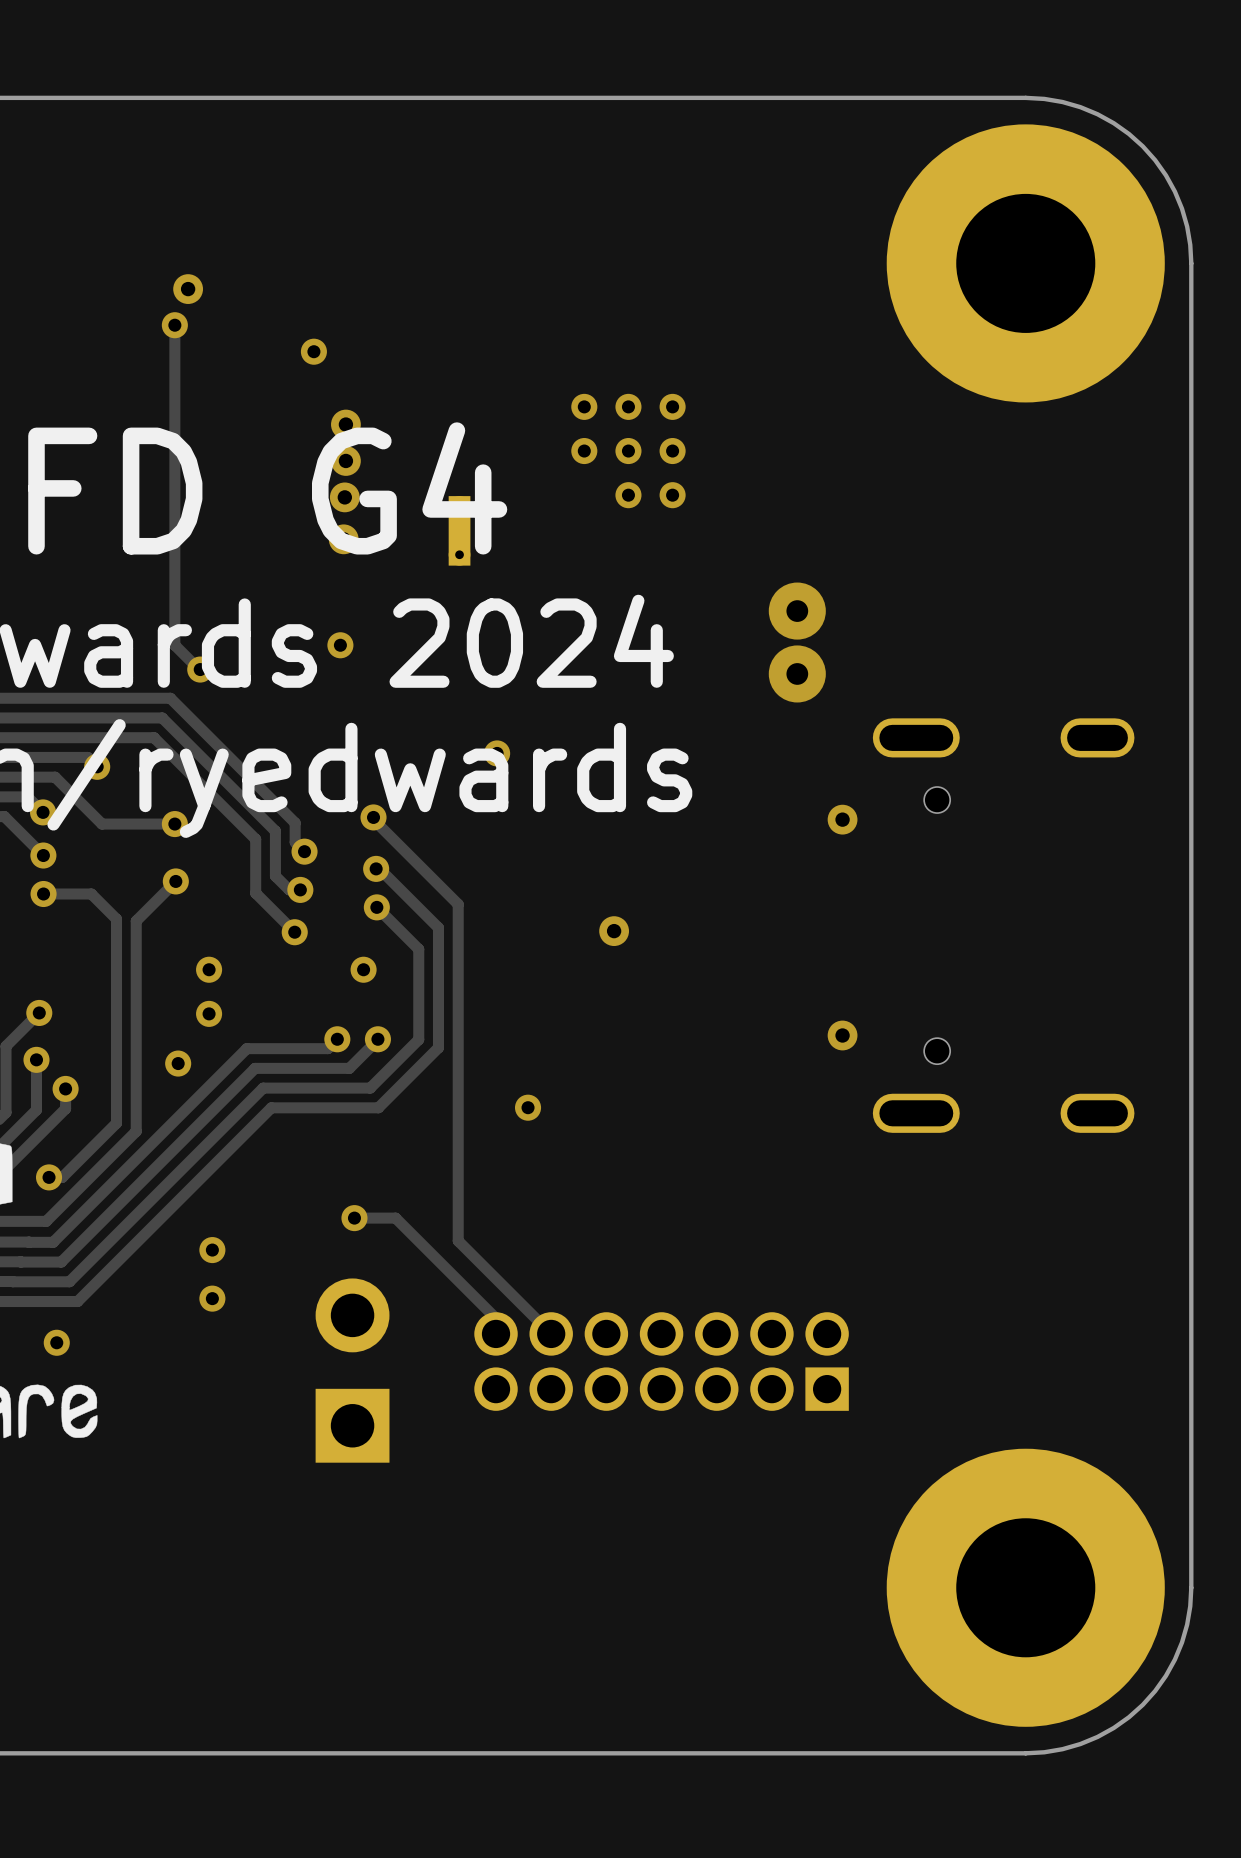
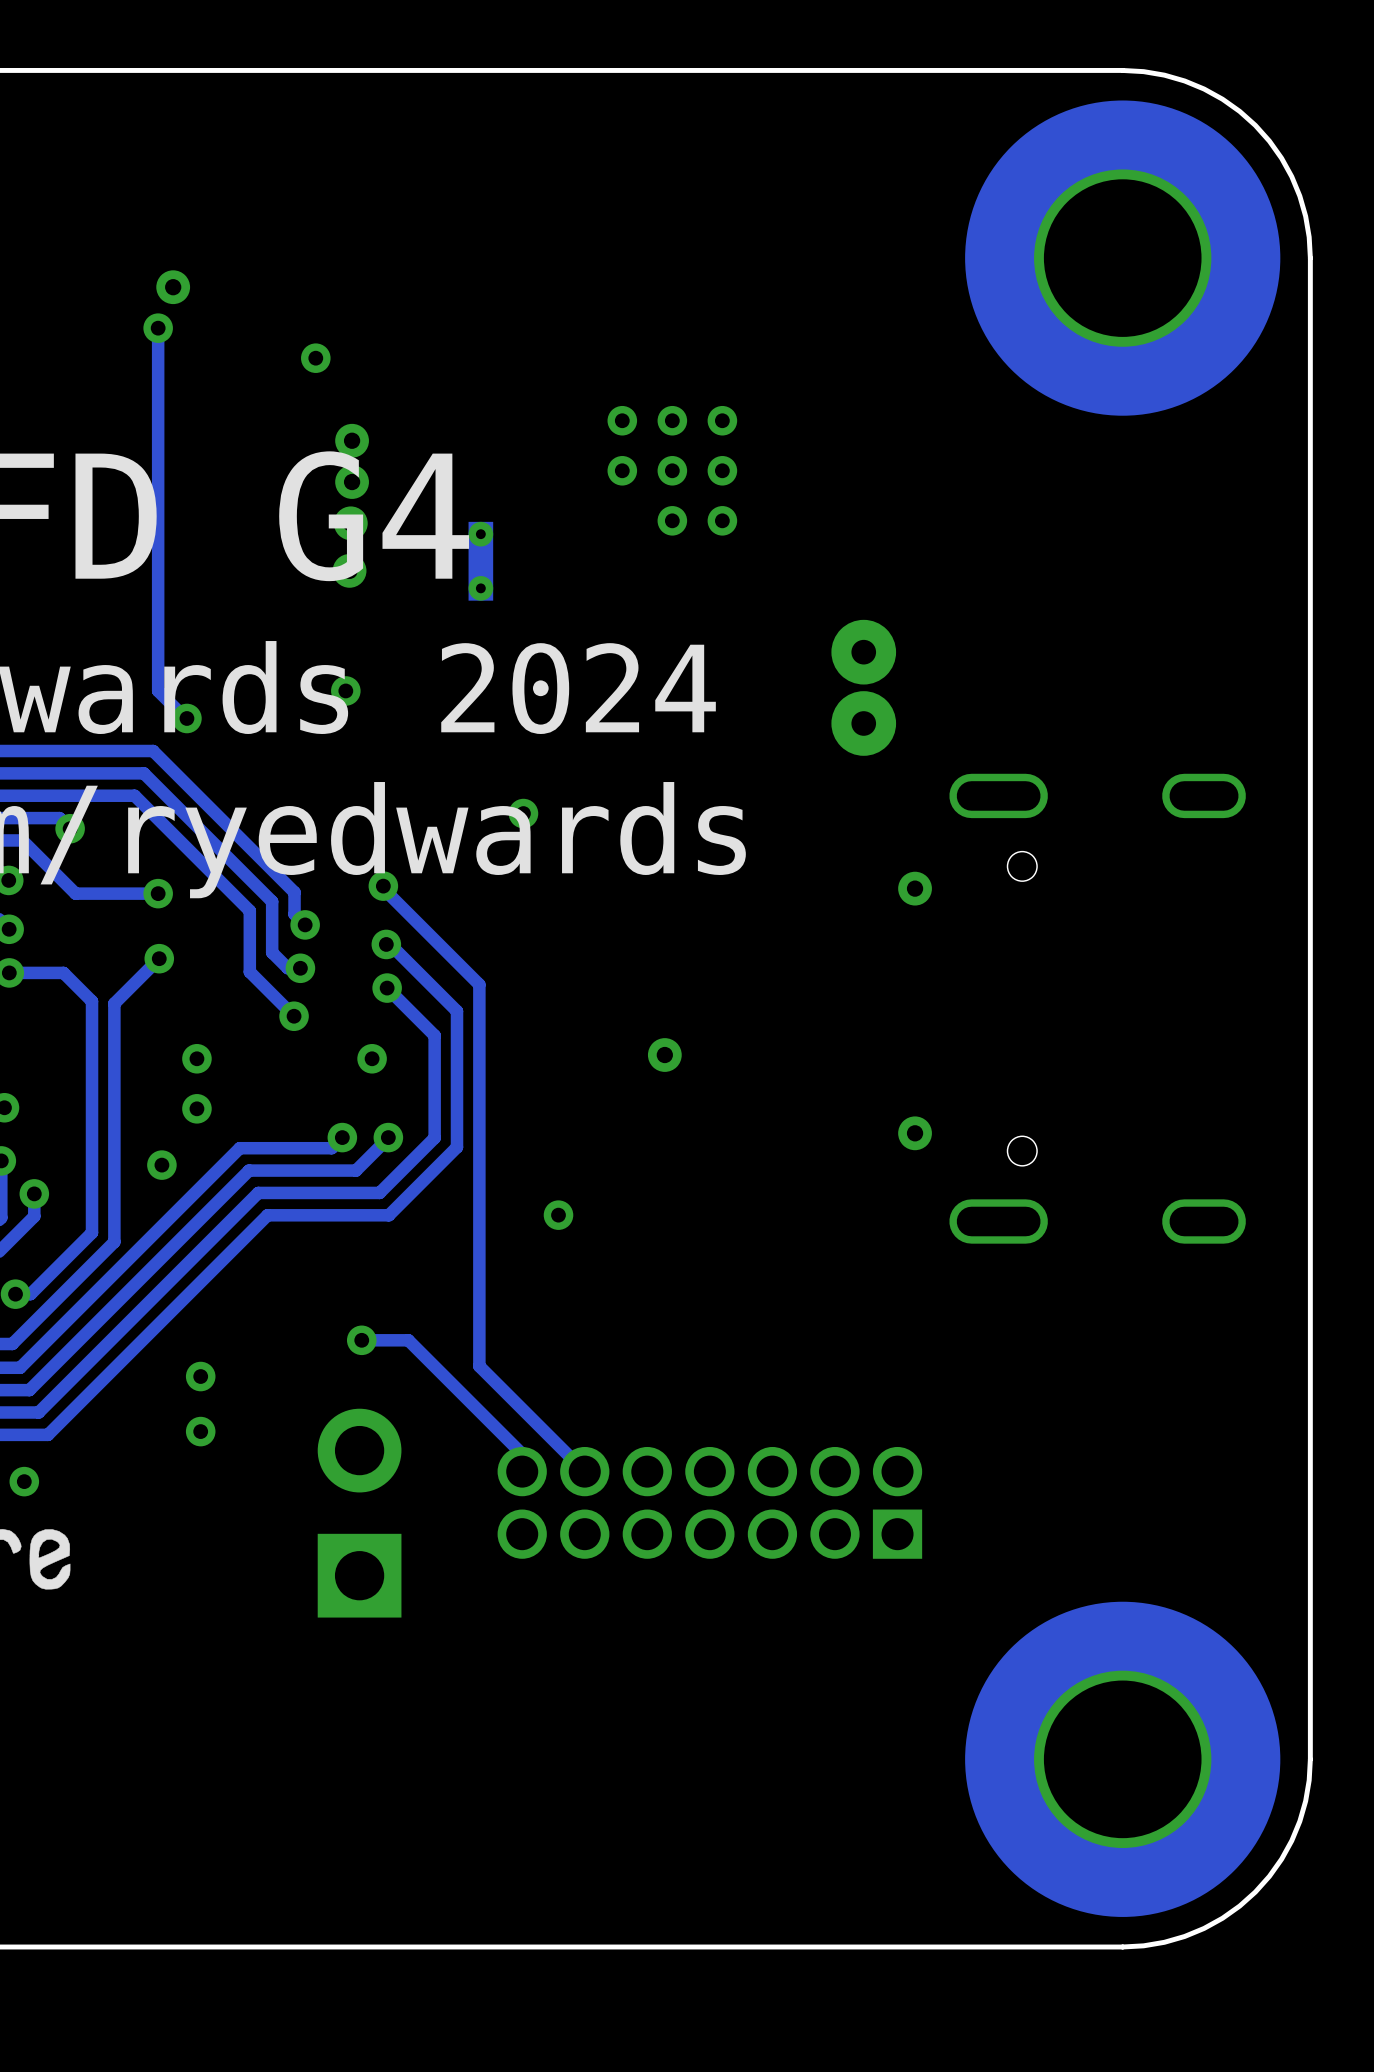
via position: (614, 931) -> (664, 1055)

